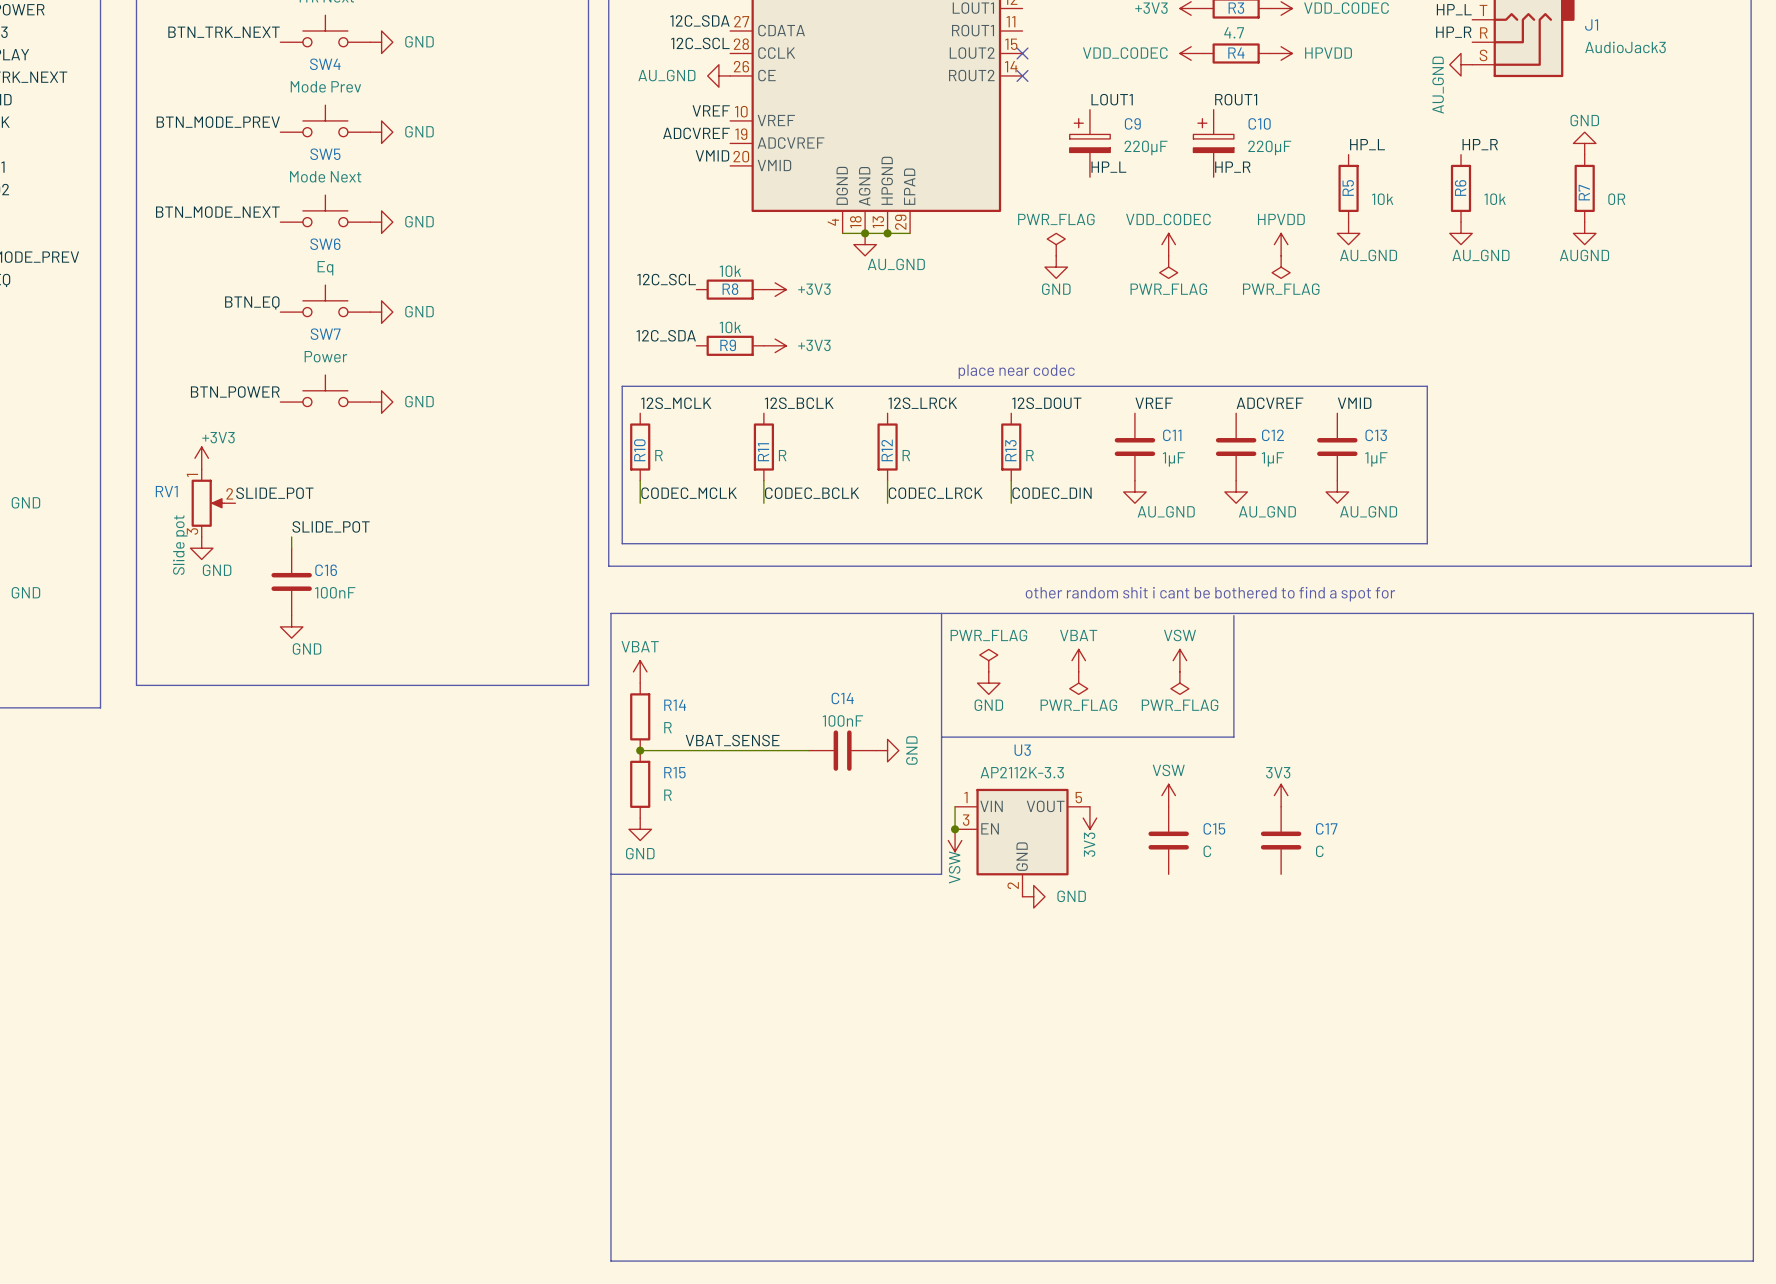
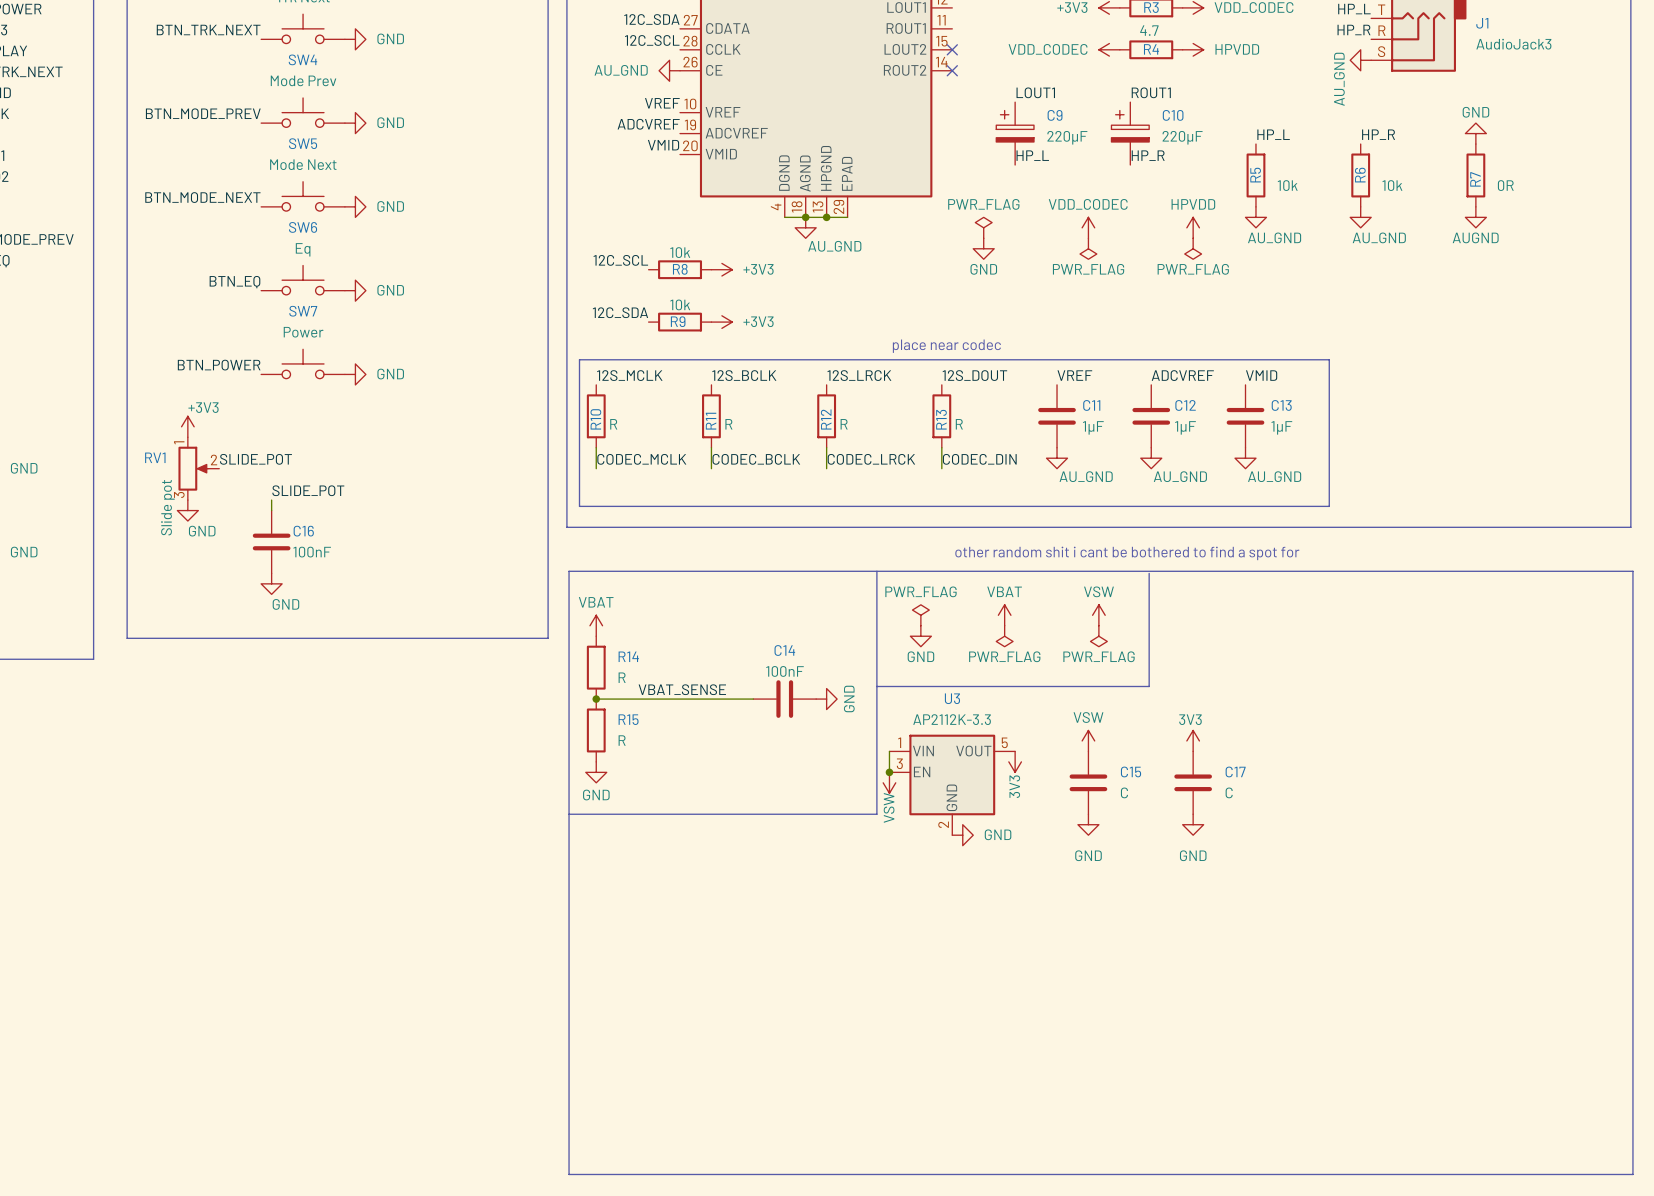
power symbol: none -> GND (1088, 824)
power symbol: none -> GND (1193, 824)

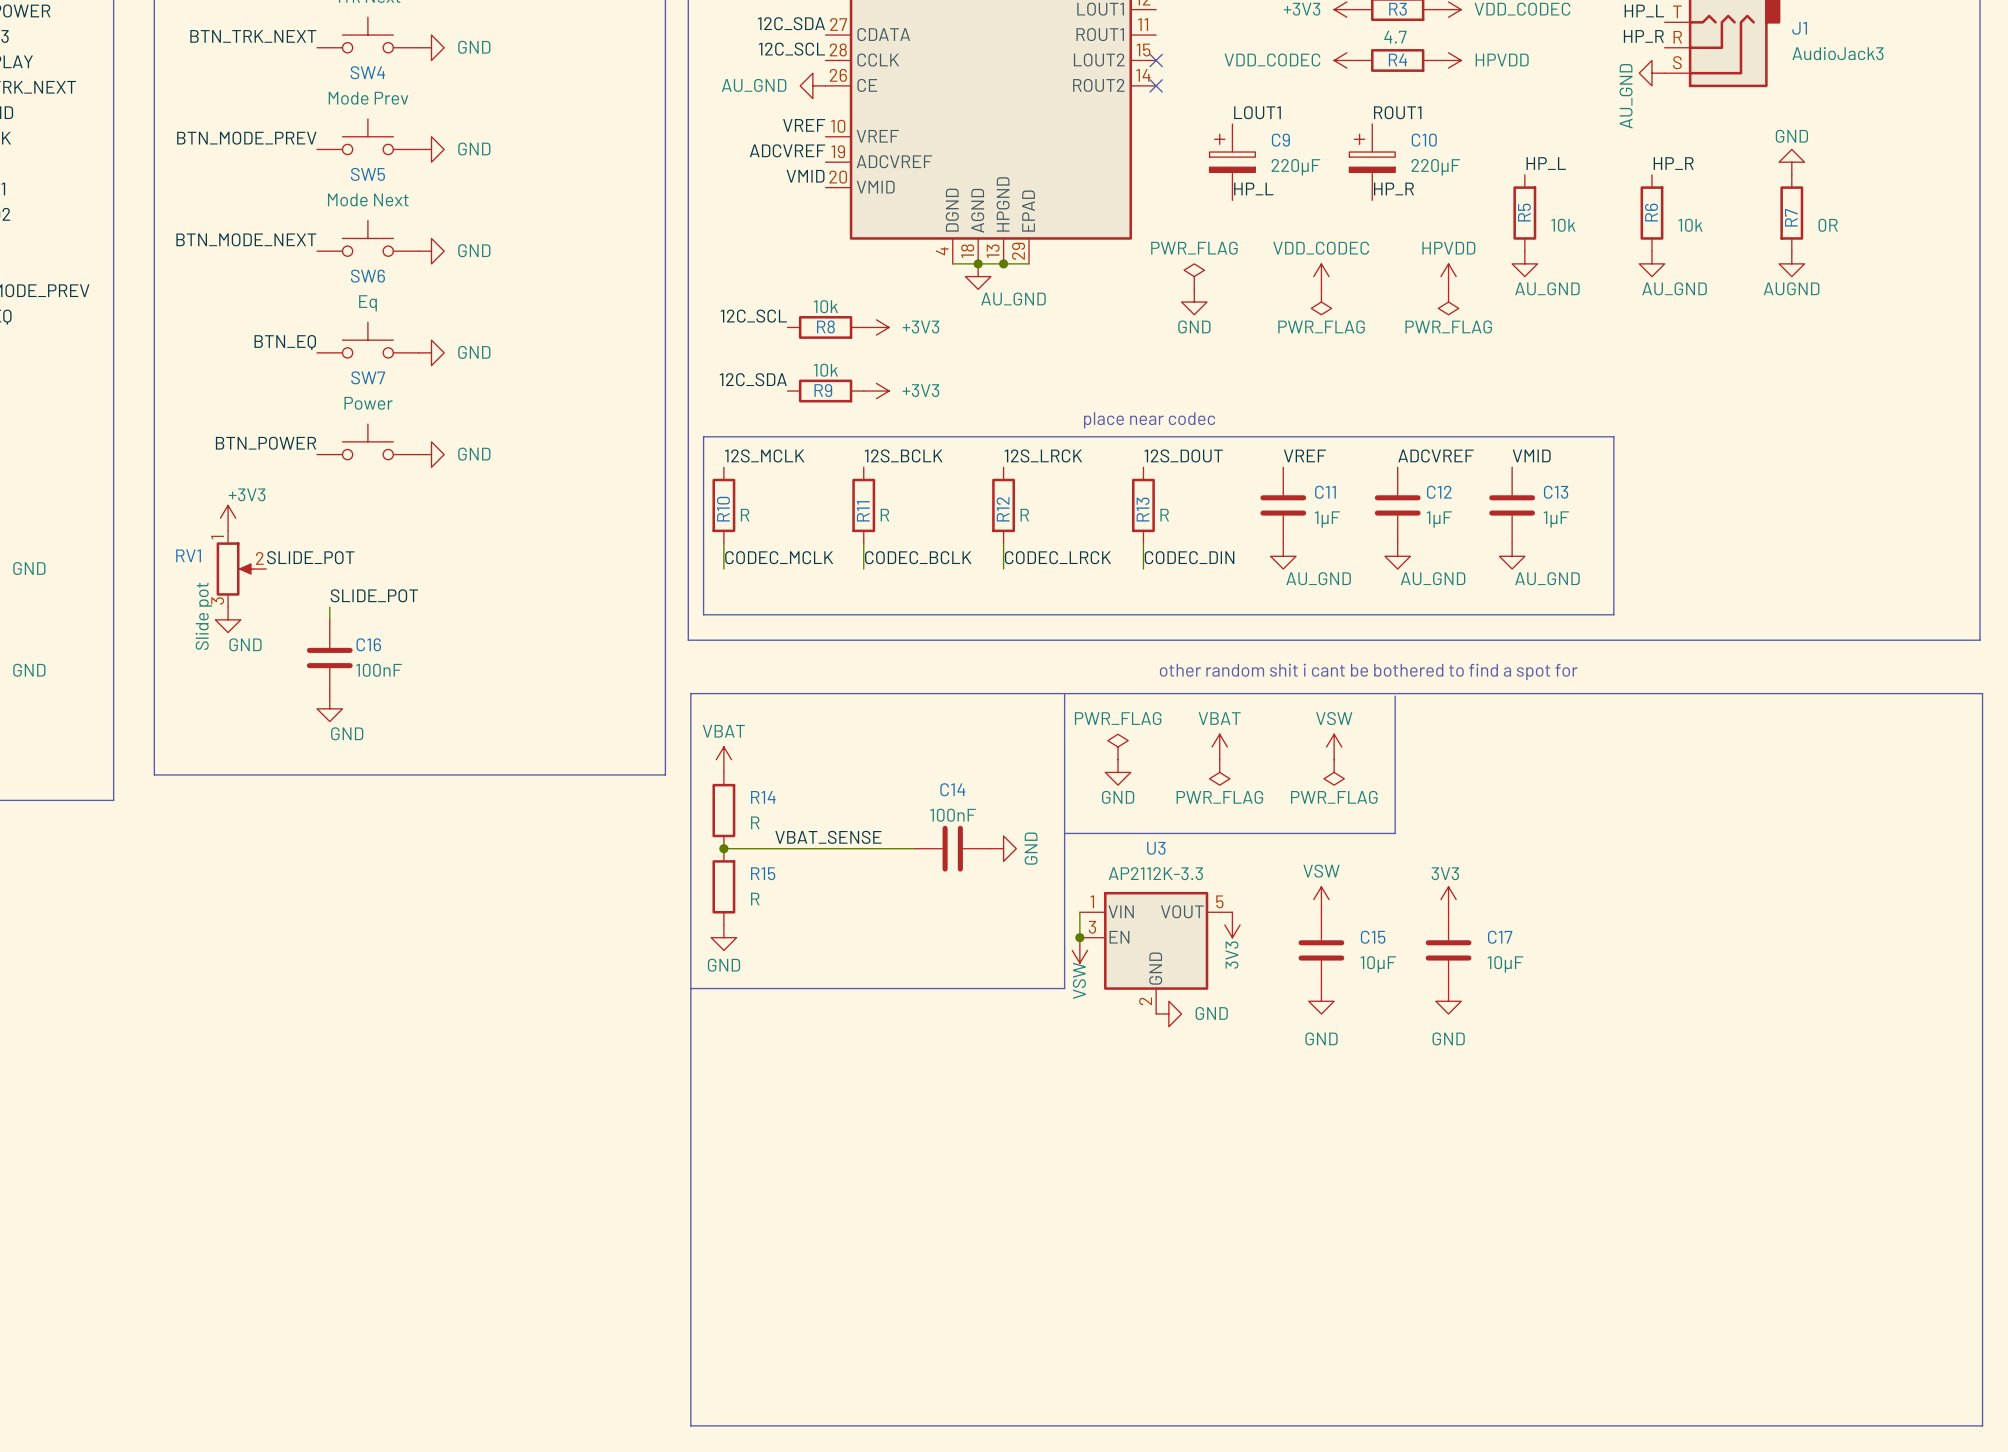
C15 value: C (1124, 792) -> 10μF (1378, 964)
C17 value: C (1229, 792) -> 10μF (1505, 964)

